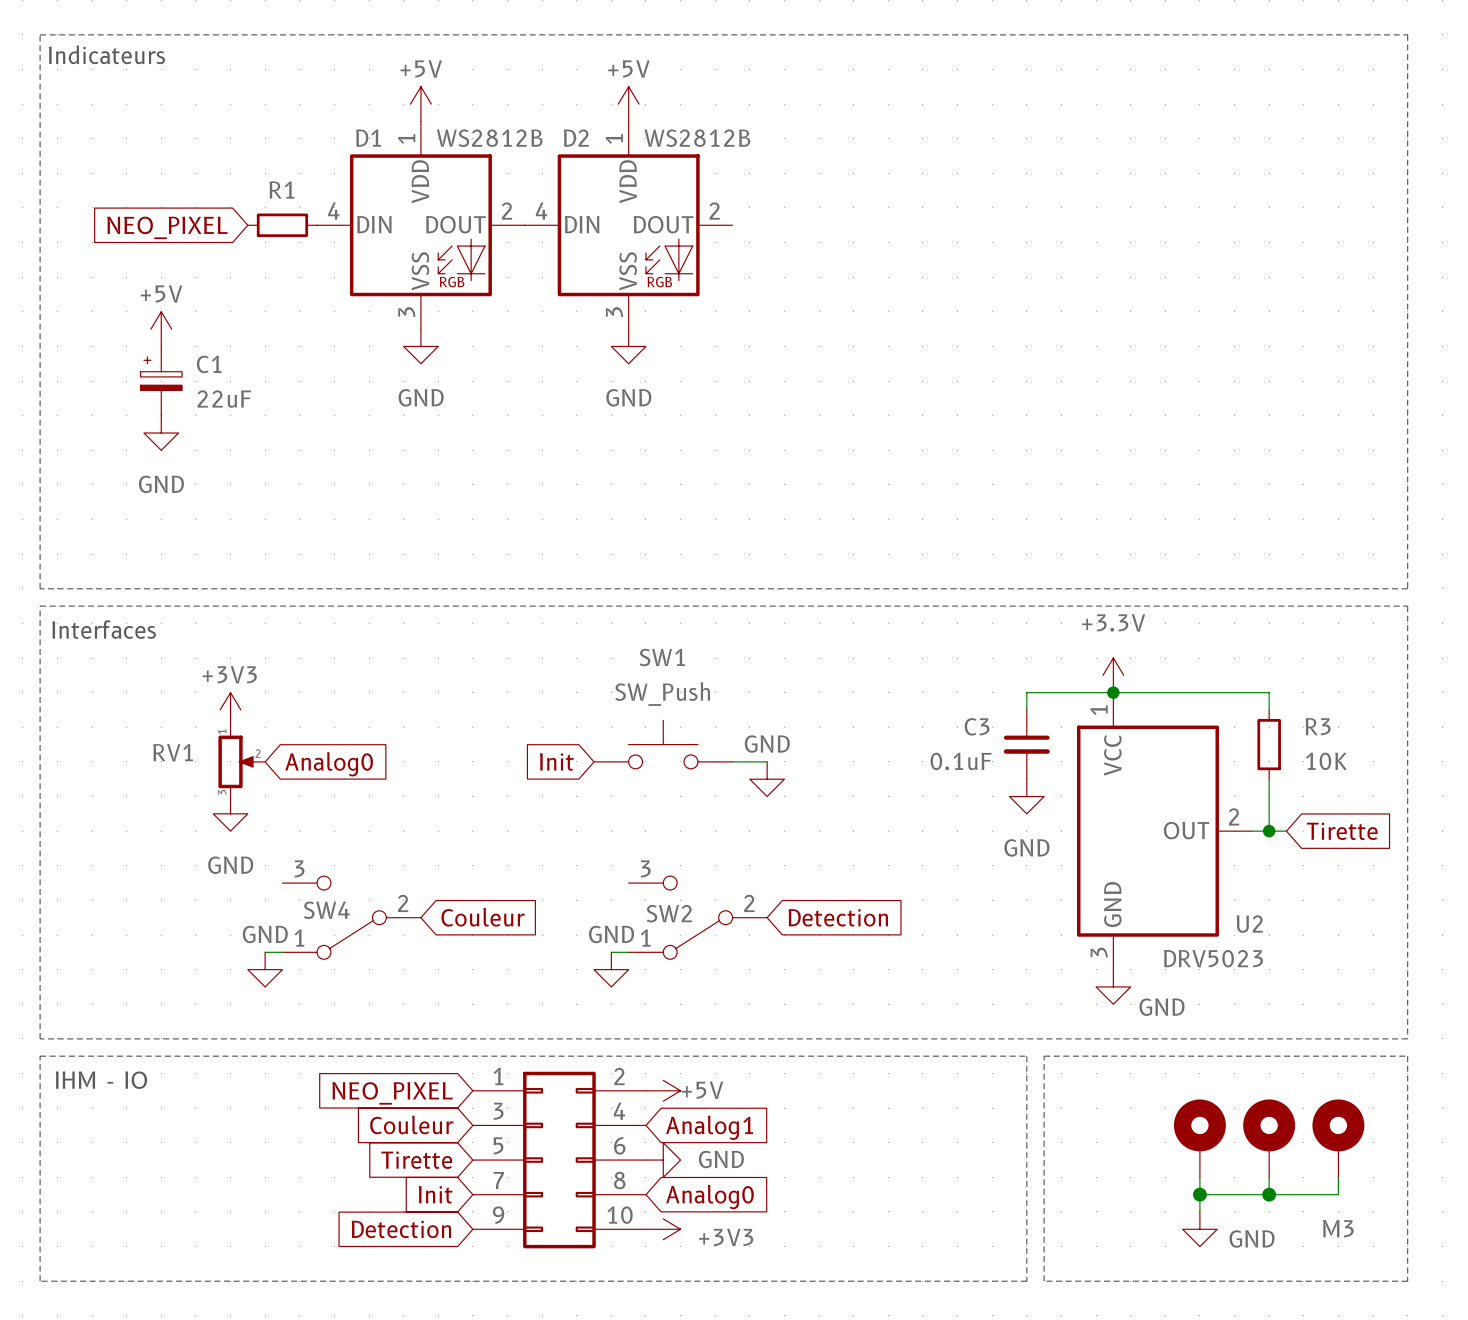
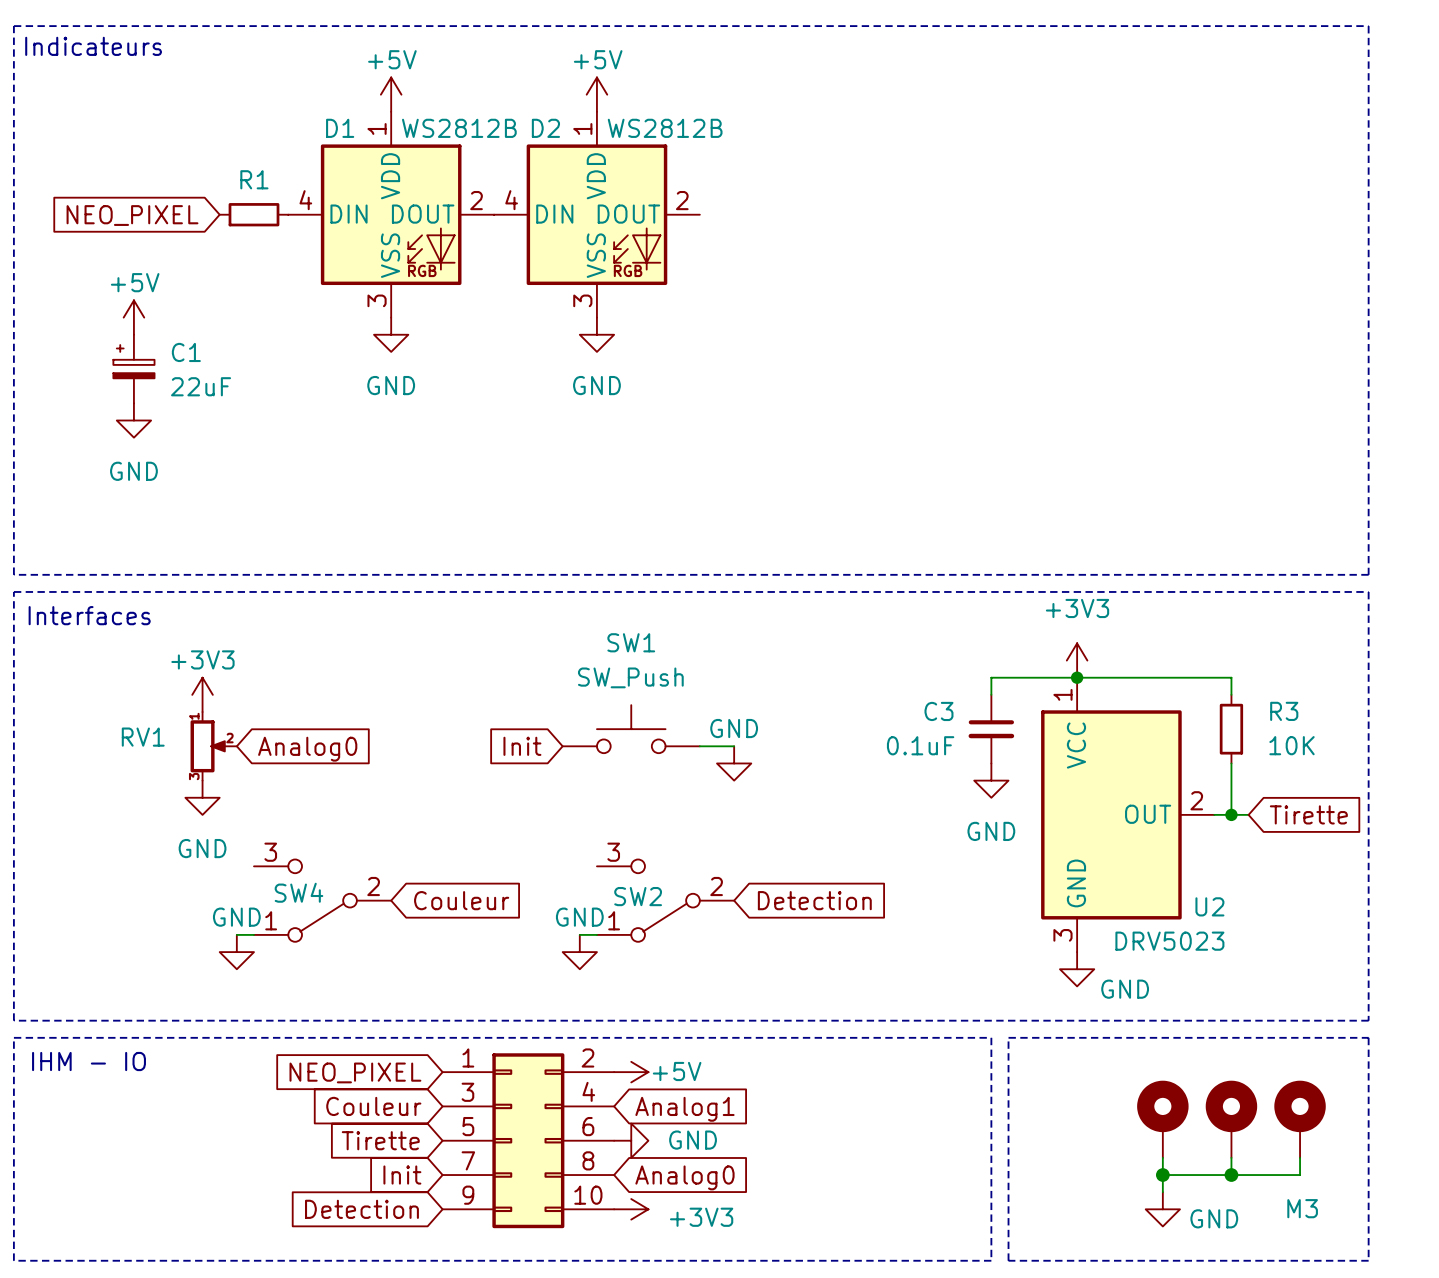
power symbol: +3.3V (1113, 675) -> +3V3 (1077, 660)

